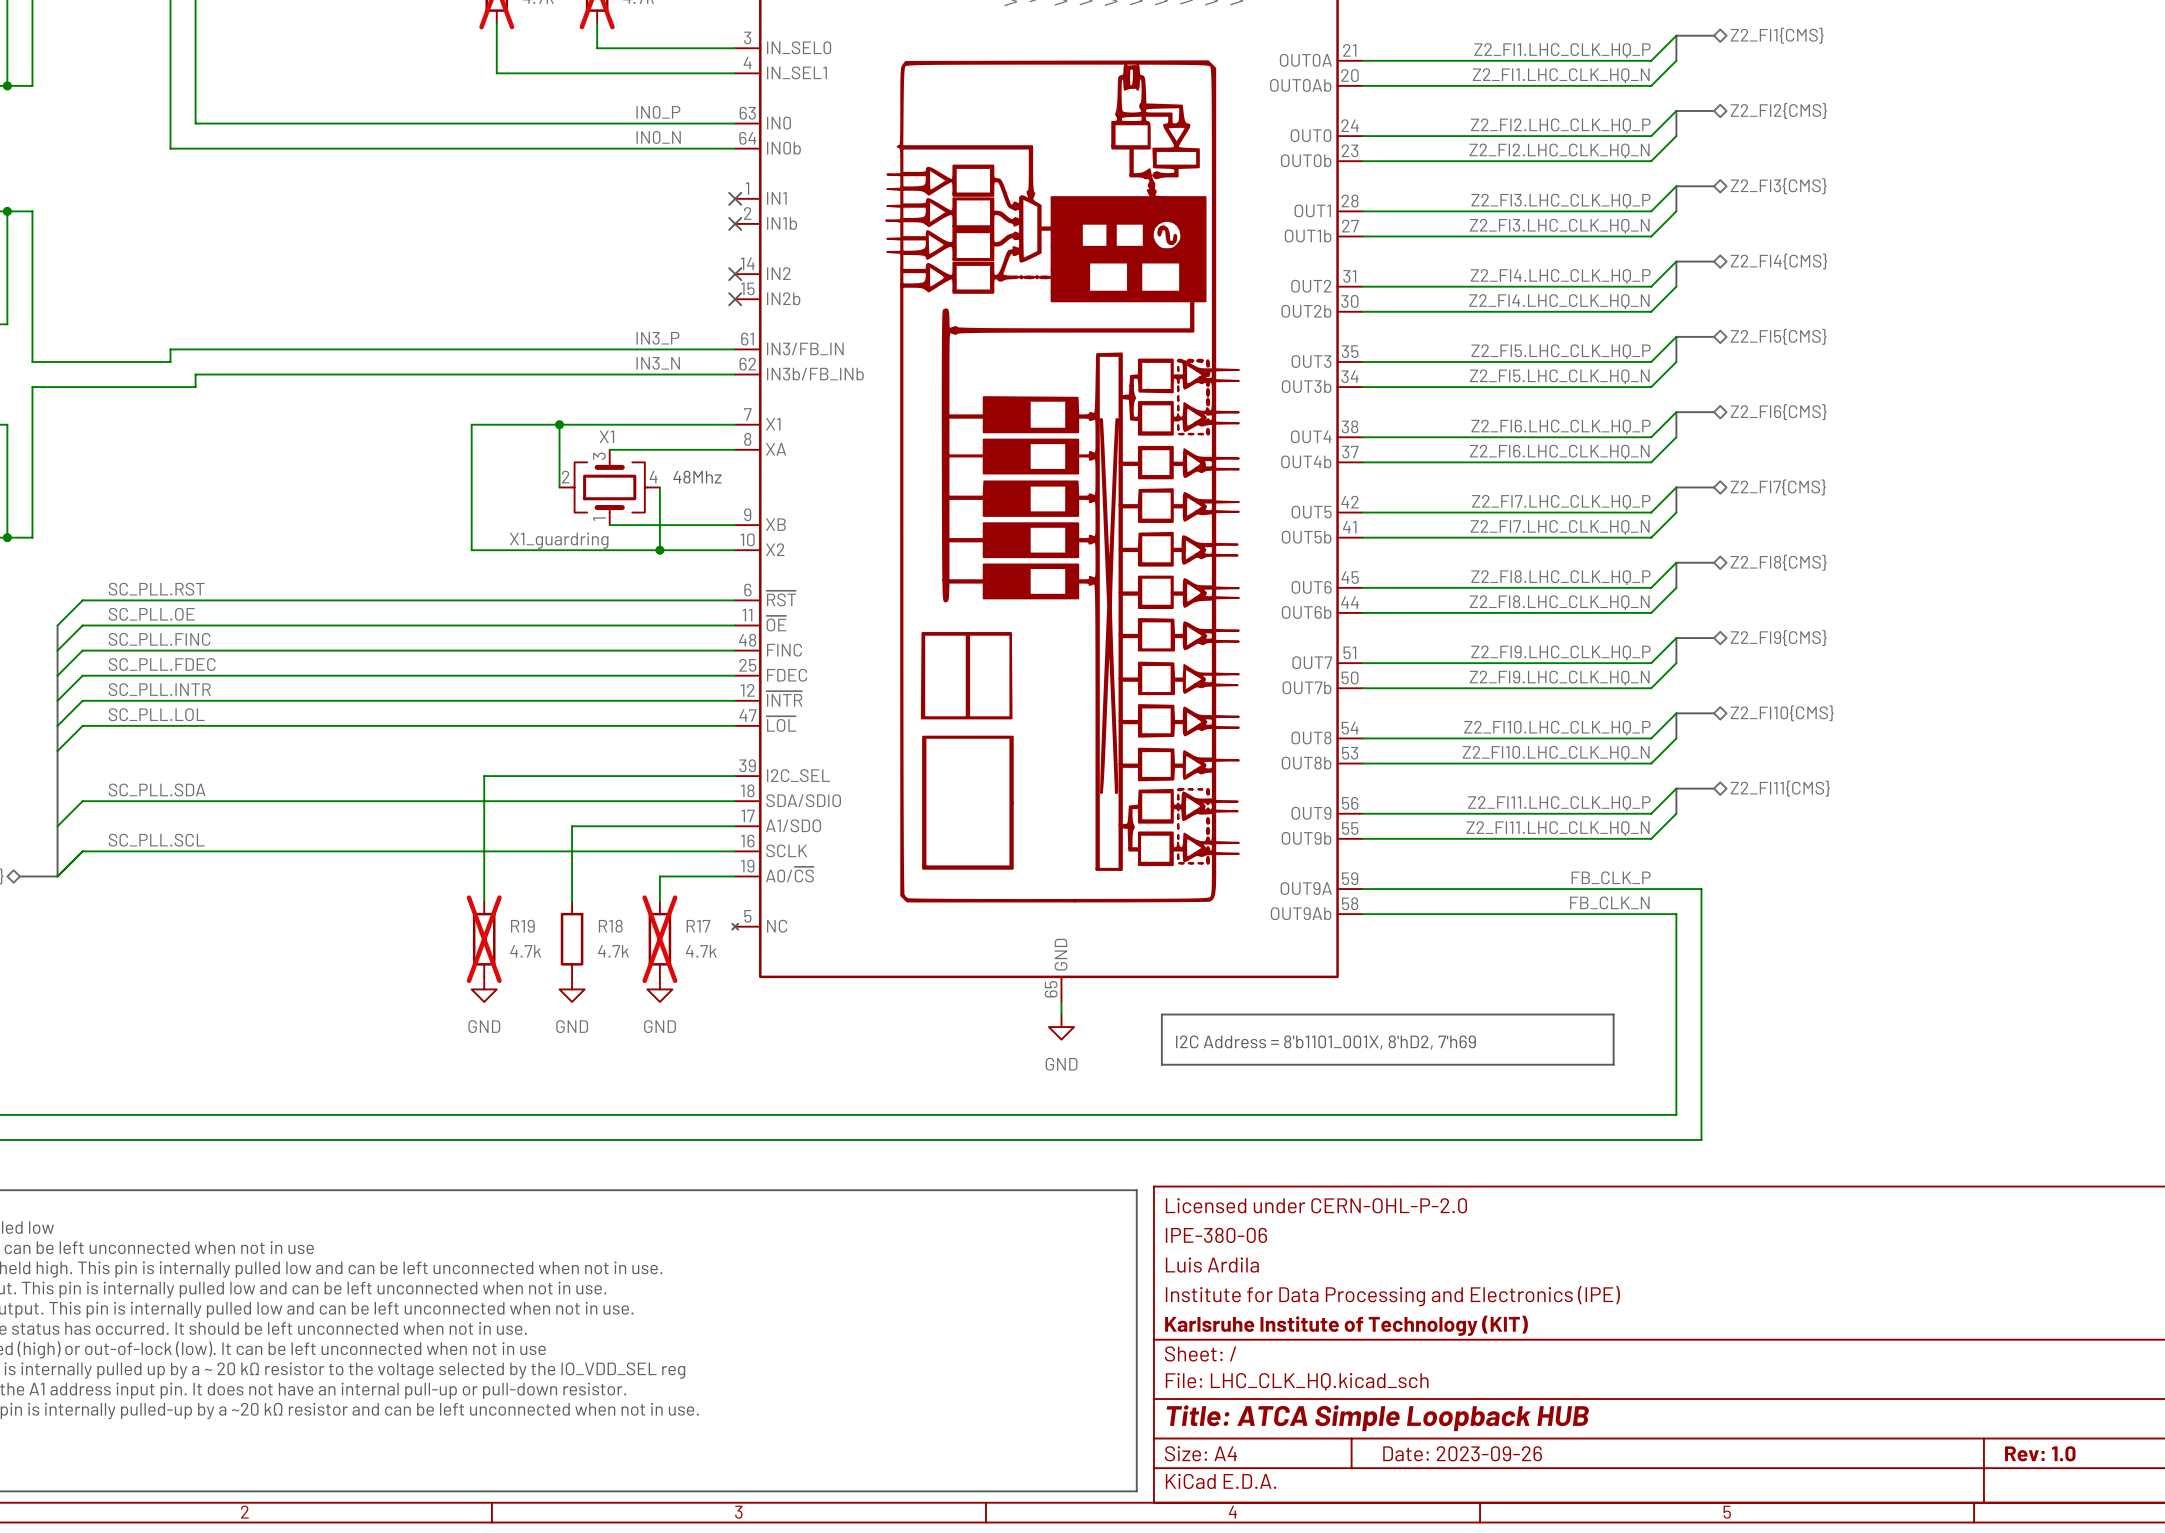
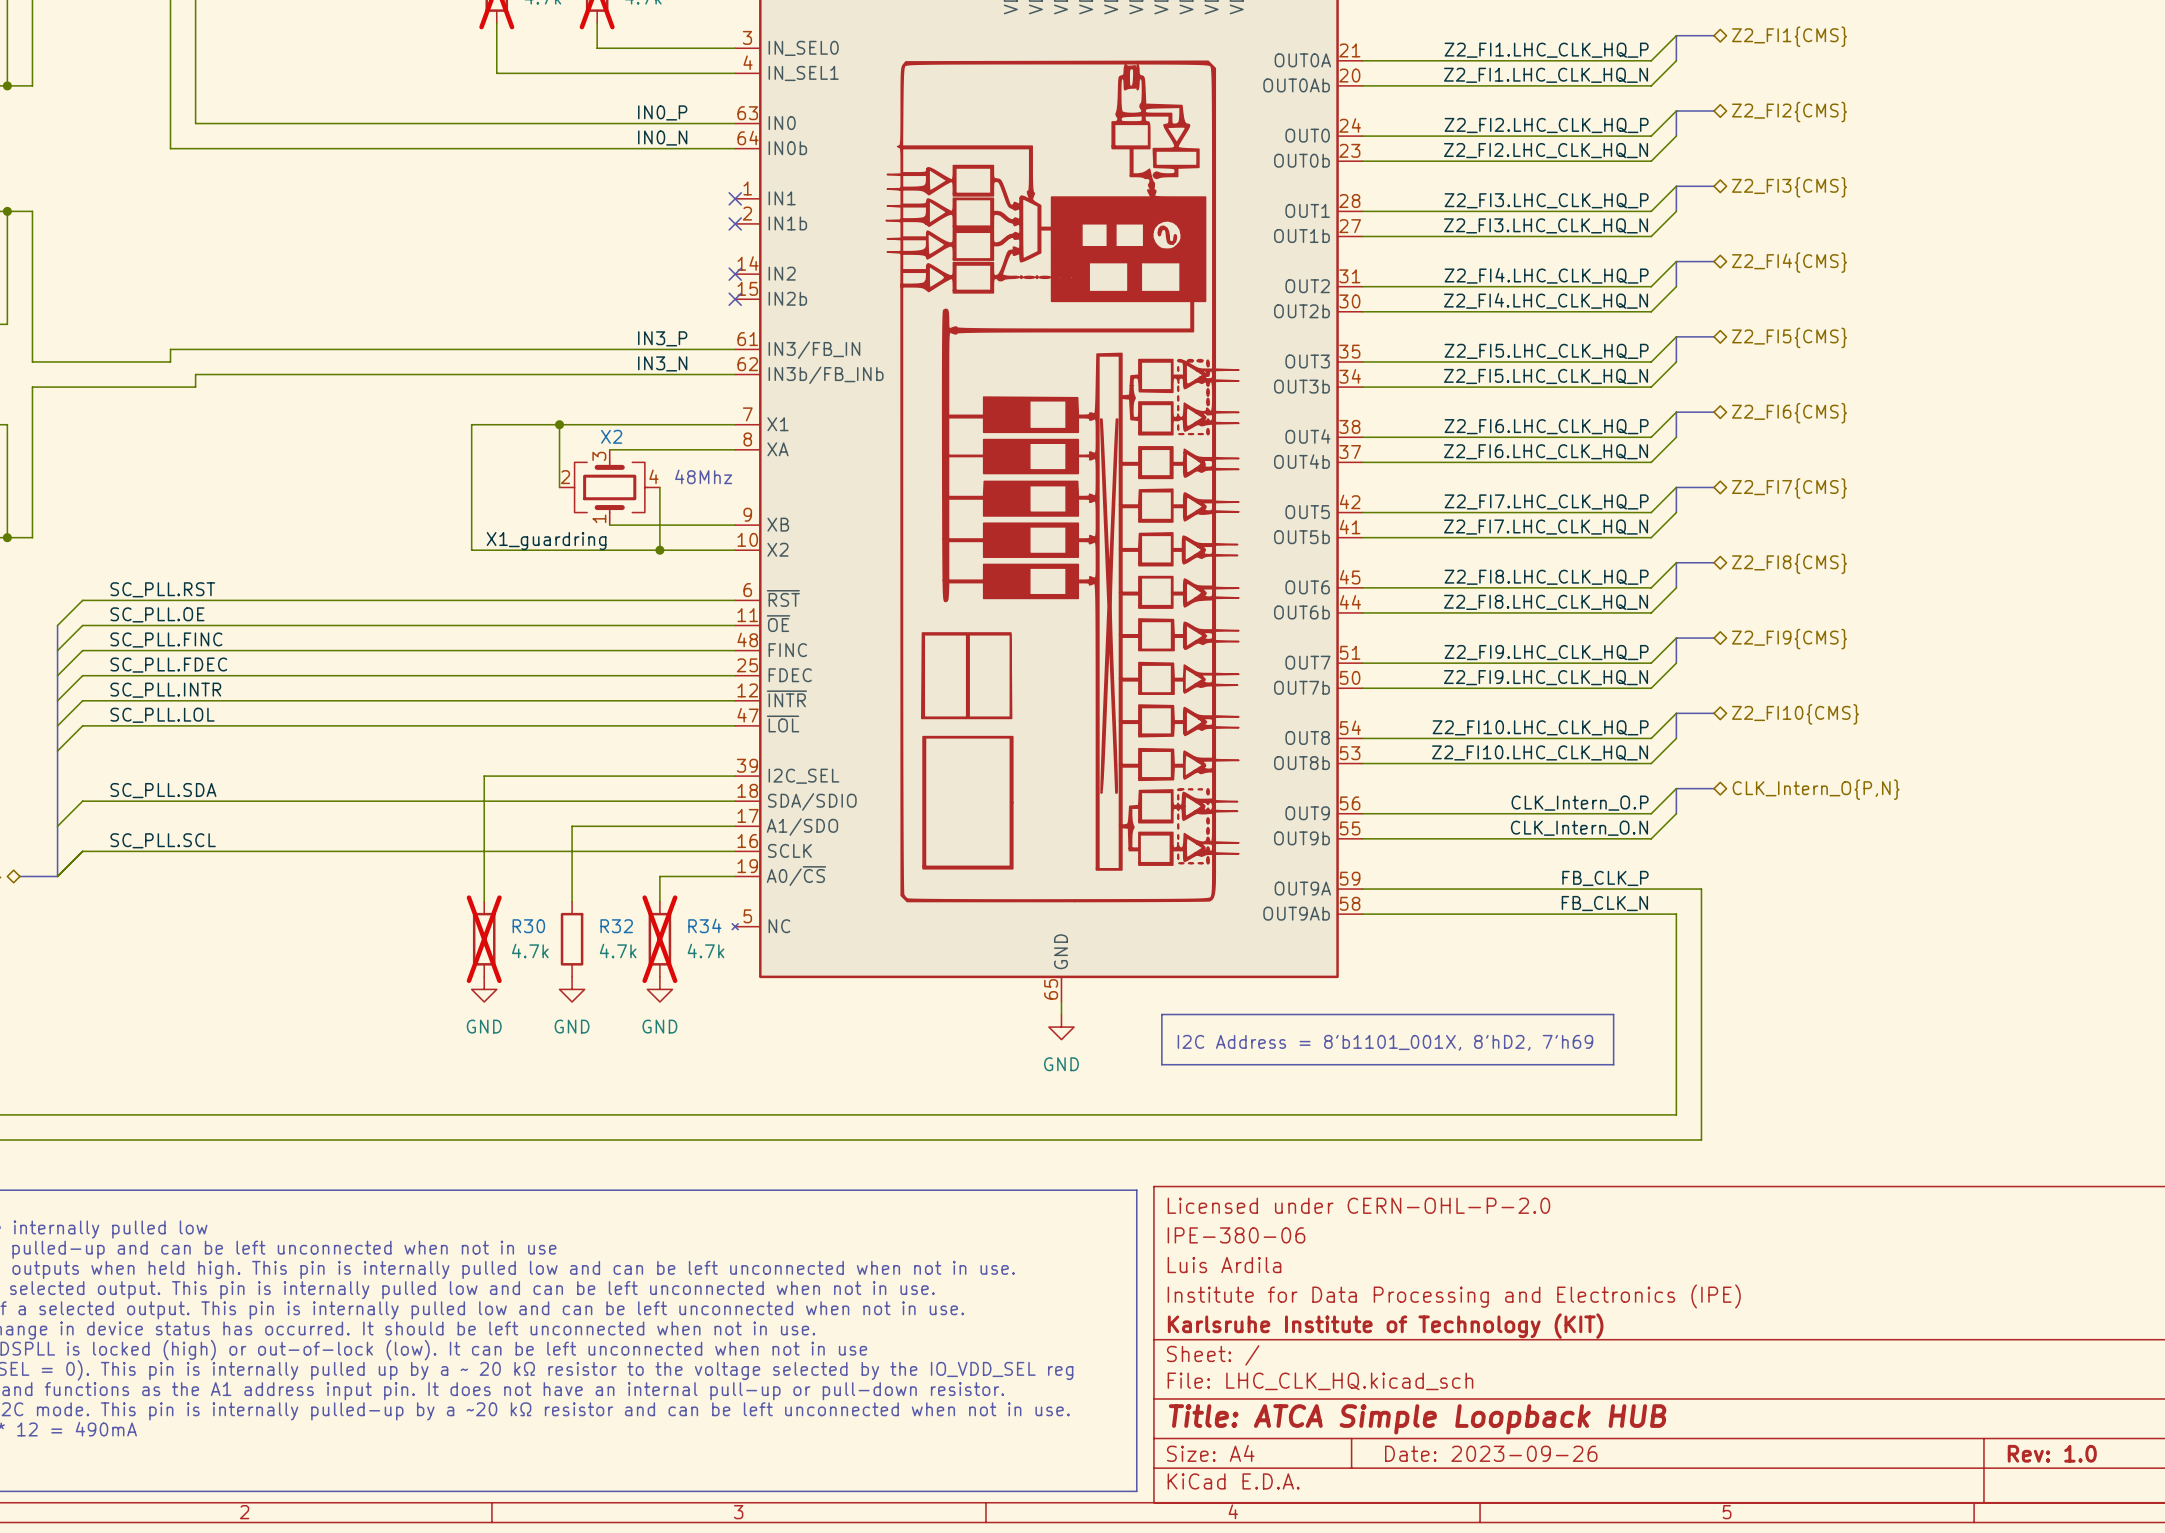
X1 name: X1 (606, 436) -> X2 (611, 436)
hierarchical label: Z2_FI11{CMS} (1780, 788) -> CLK_Intern_O{P,N} (1816, 789)
label: Z2_FI11.LHC_CLK_HQ_P (1559, 803) -> CLK_Intern_O.P (1580, 803)
label: Z2_FI11.LHC_CLK_HQ_N (1558, 828) -> CLK_Intern_O.N (1579, 828)
R19 name: R19 (522, 926) -> R30 (528, 926)
R18 name: R18 (610, 926) -> R32 (616, 926)
R17 name: R17 (698, 926) -> R34 (704, 925)

